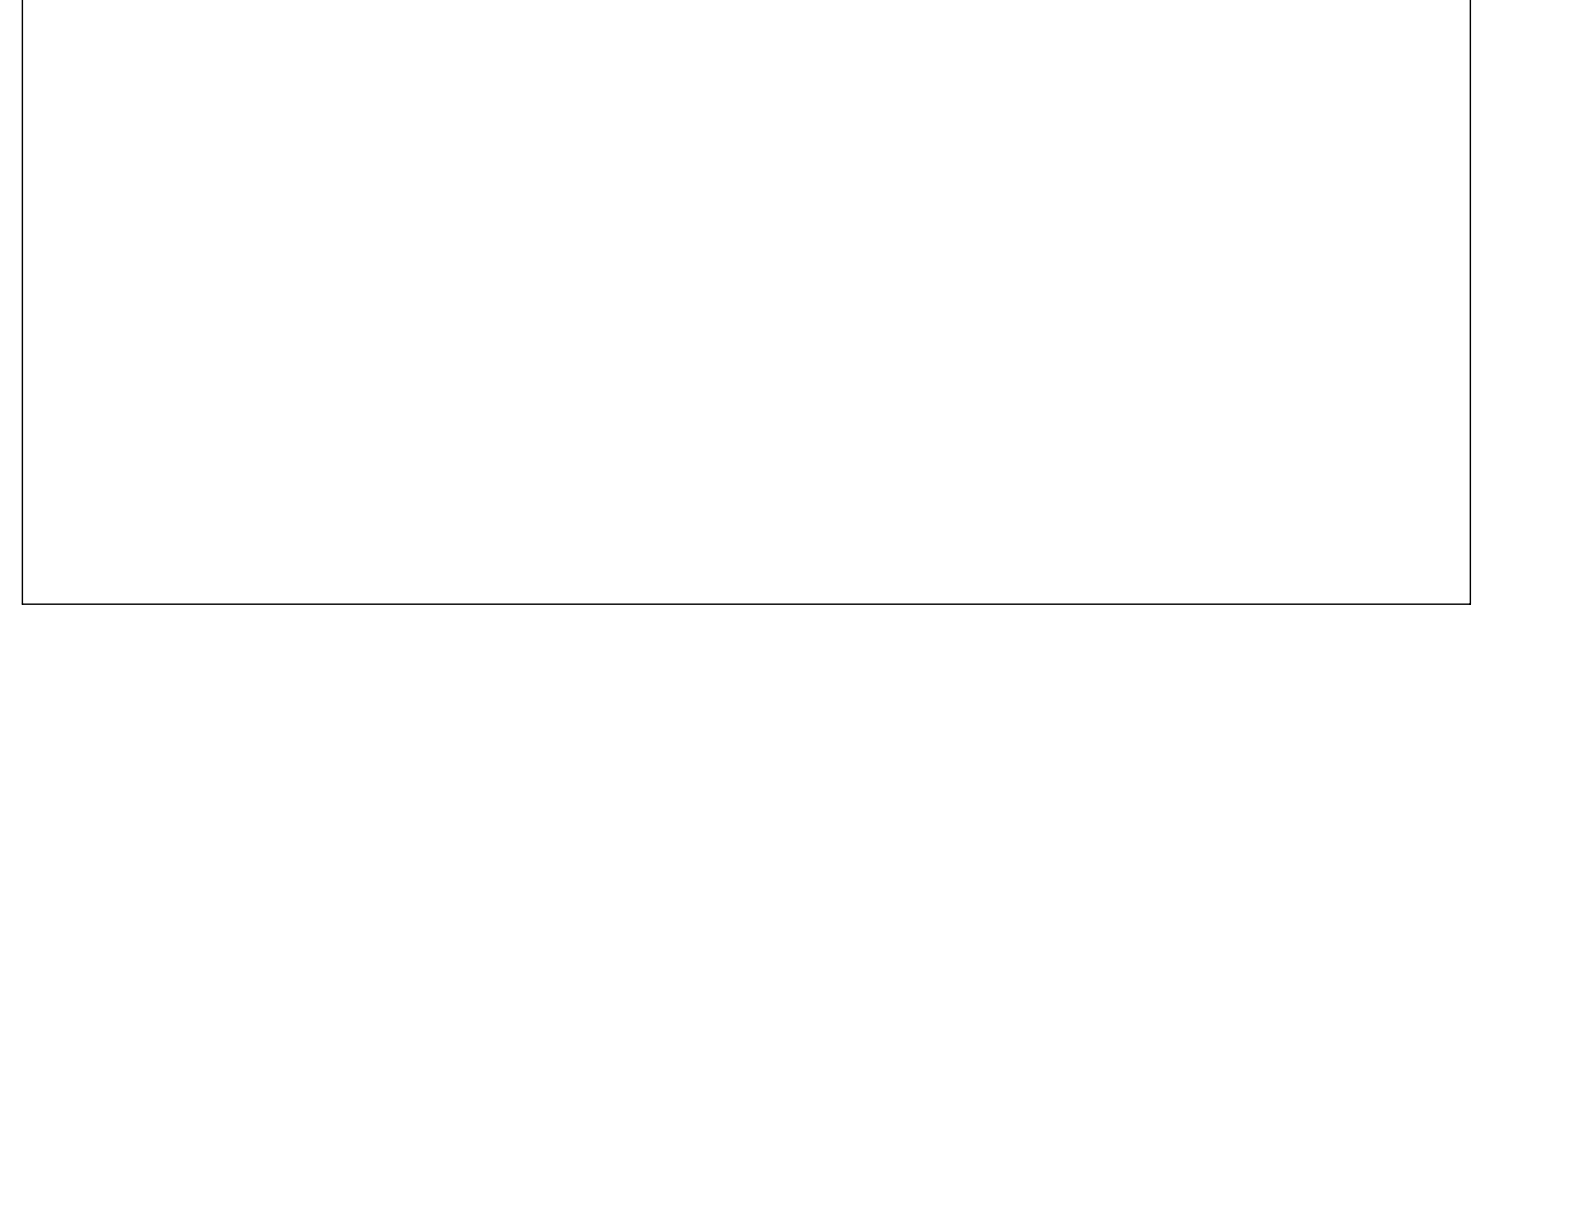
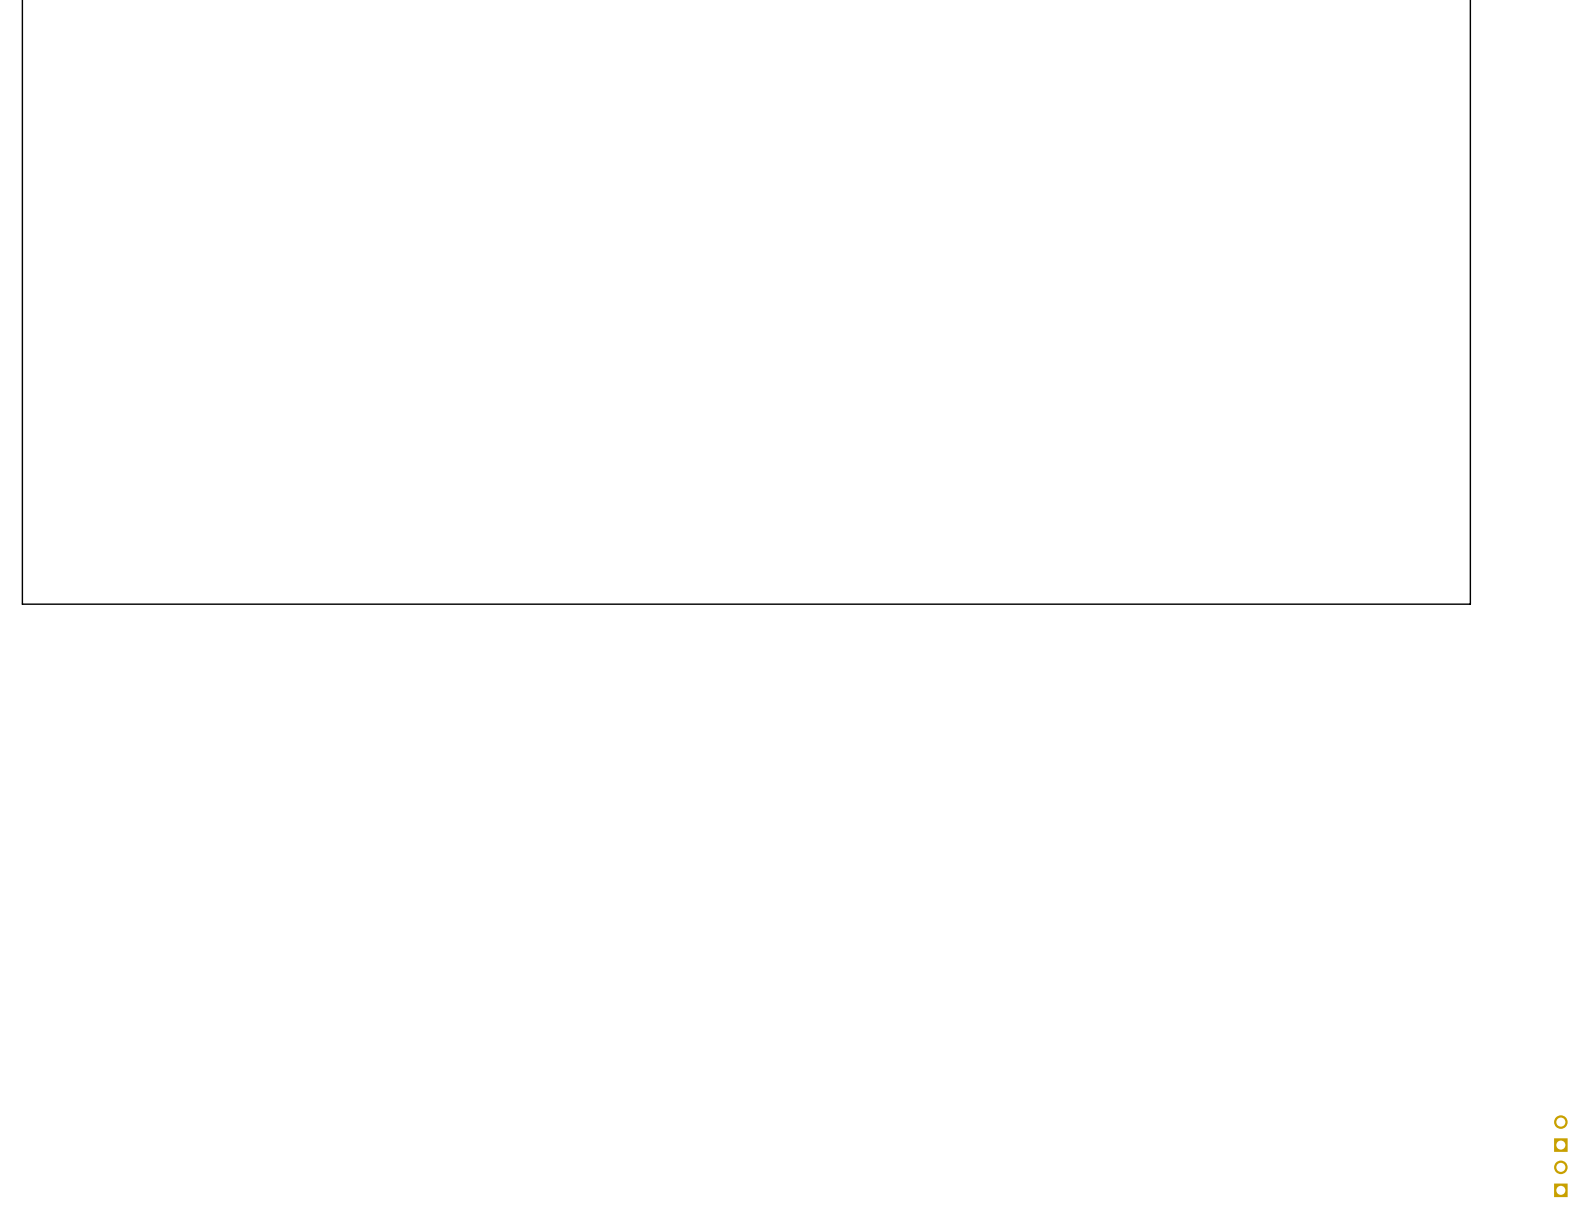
part: none -> (1560, 1133)
part: none -> (1560, 1178)

